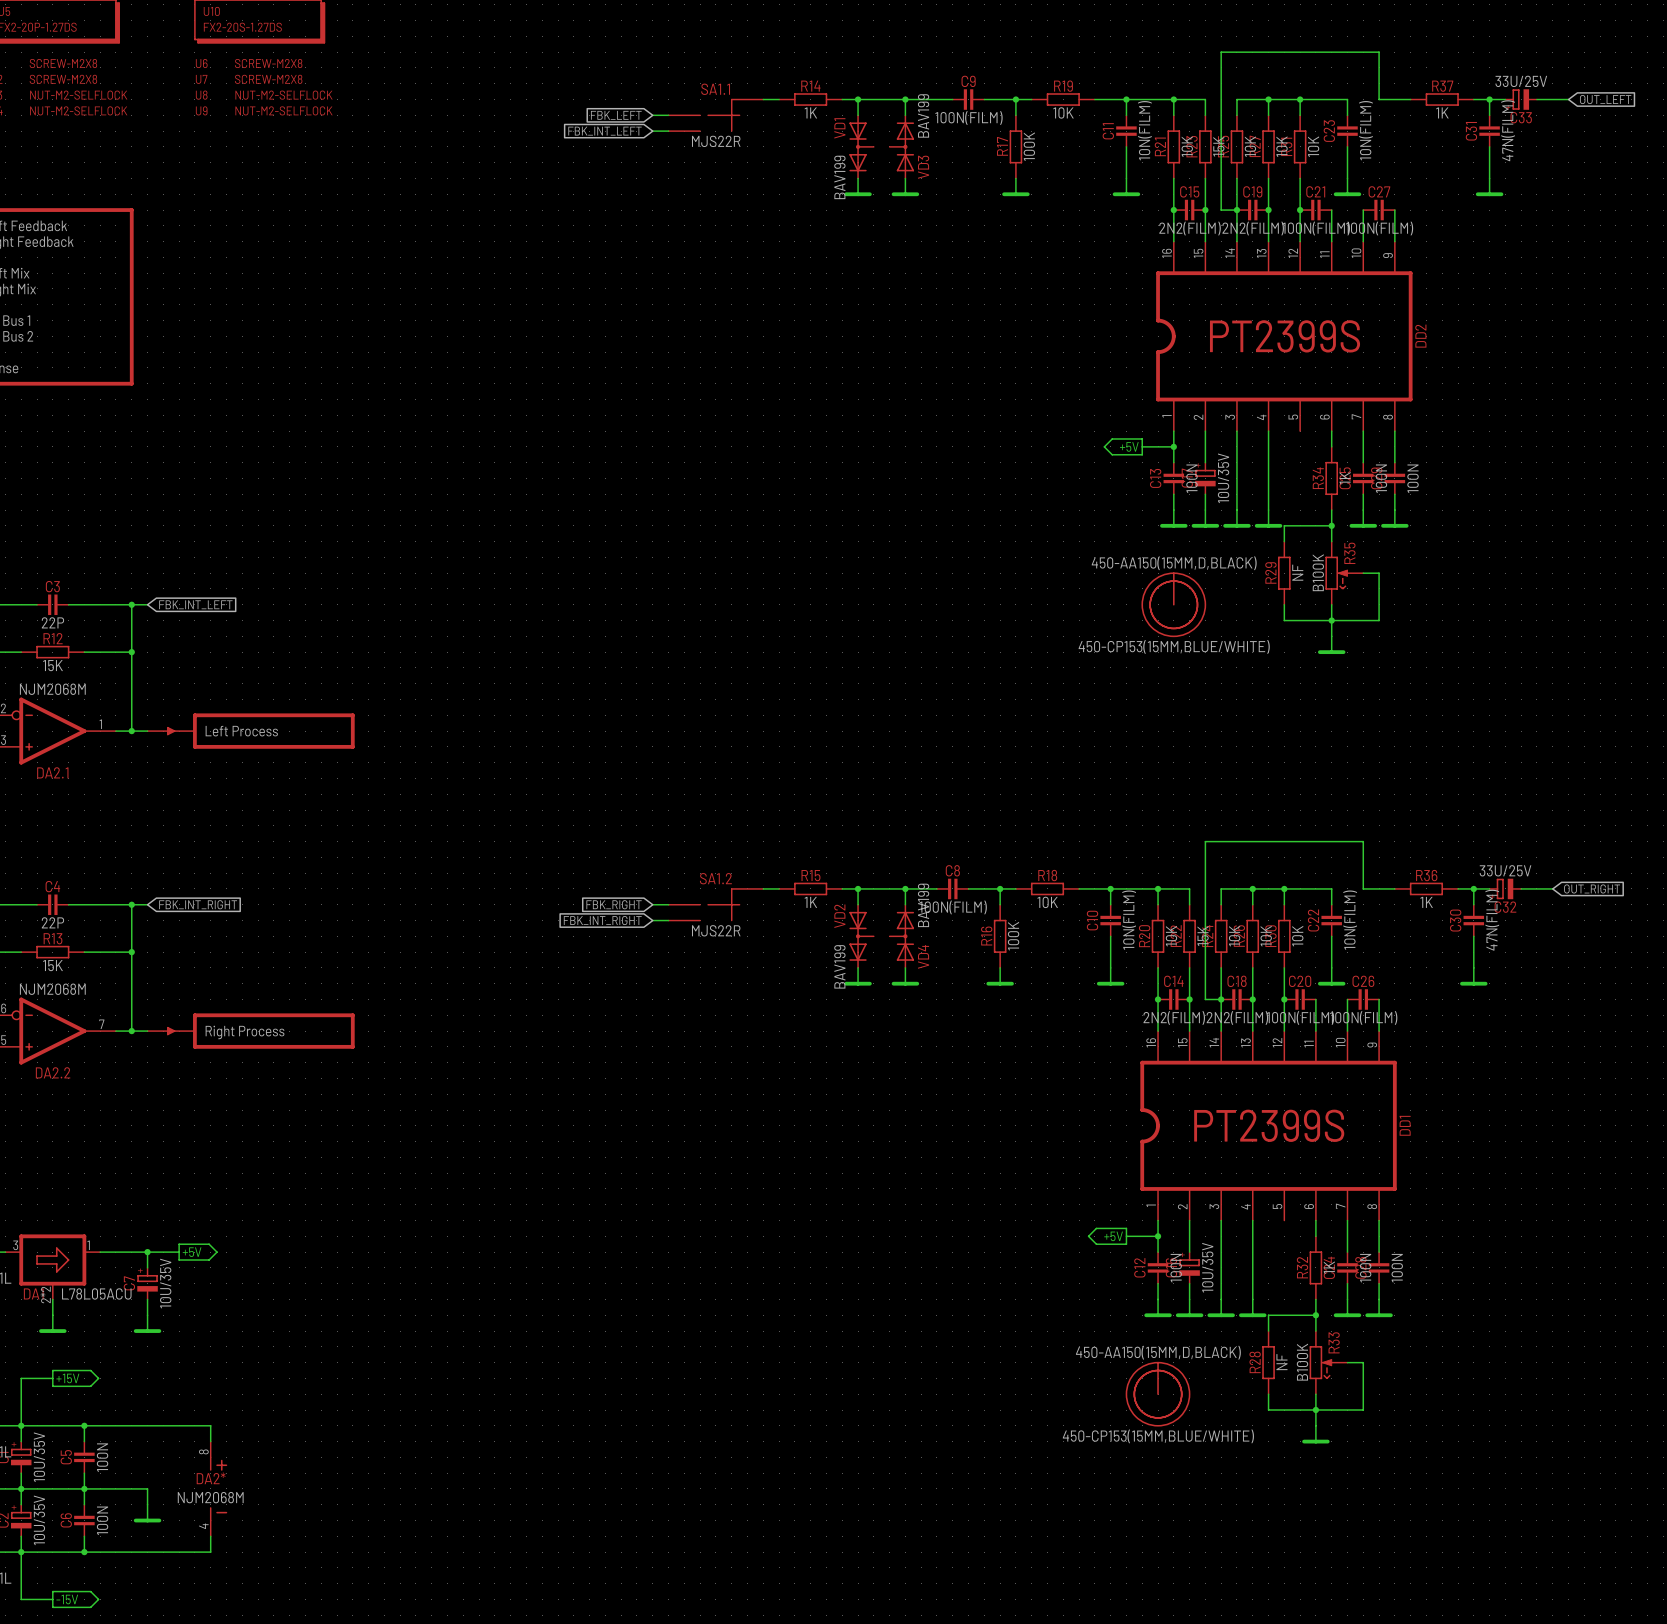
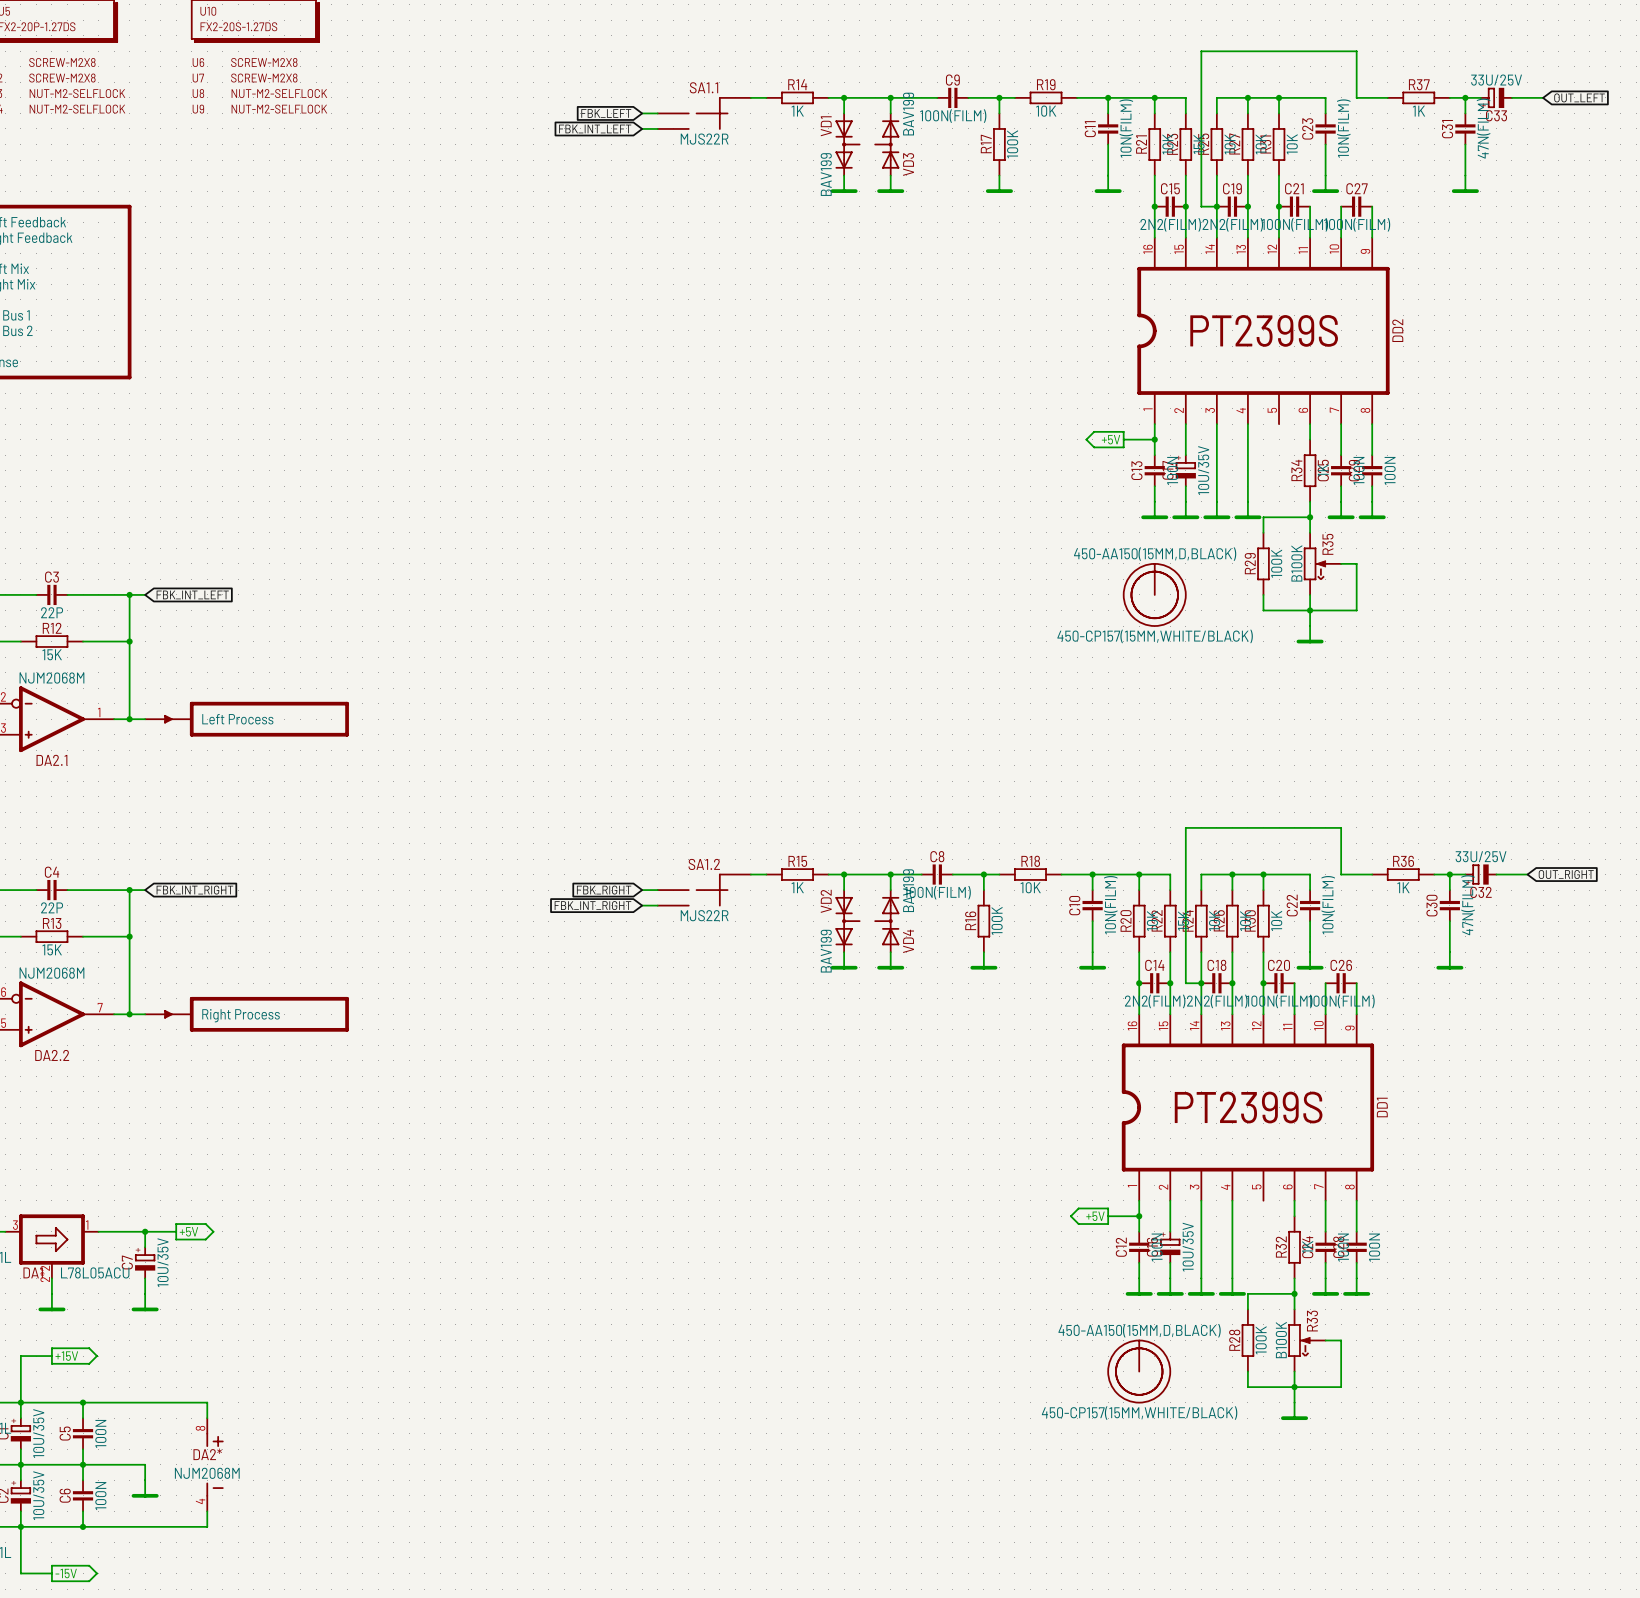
R29 value: NF (1297, 572) -> 100K (1276, 563)
part value: 450-CP153(15MM,BLUE/WHITE) (1174, 646) -> 450-CP157(15MM,WHITE/BLACK) (1155, 636)
R28 value: NF (1281, 1362) -> 100K (1261, 1340)
part value: 450-CP153(15MM,BLUE/WHITE) (1158, 1436) -> 450-CP157(15MM,WHITE/BLACK) (1139, 1413)

